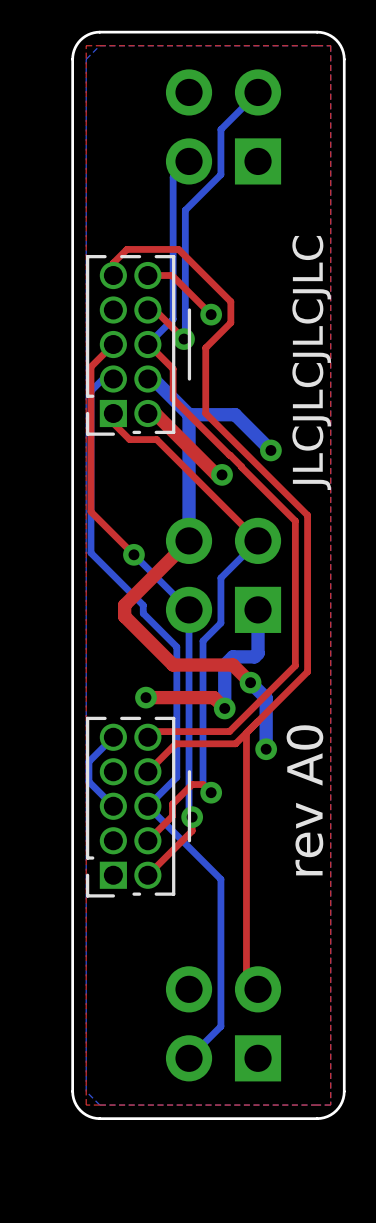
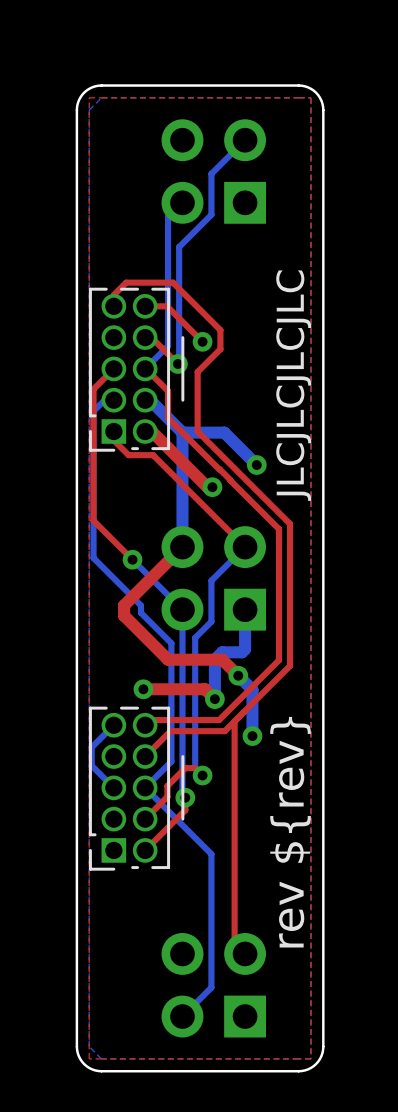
text: rev A0 (304, 800) -> rev ${rev} (290, 832)

